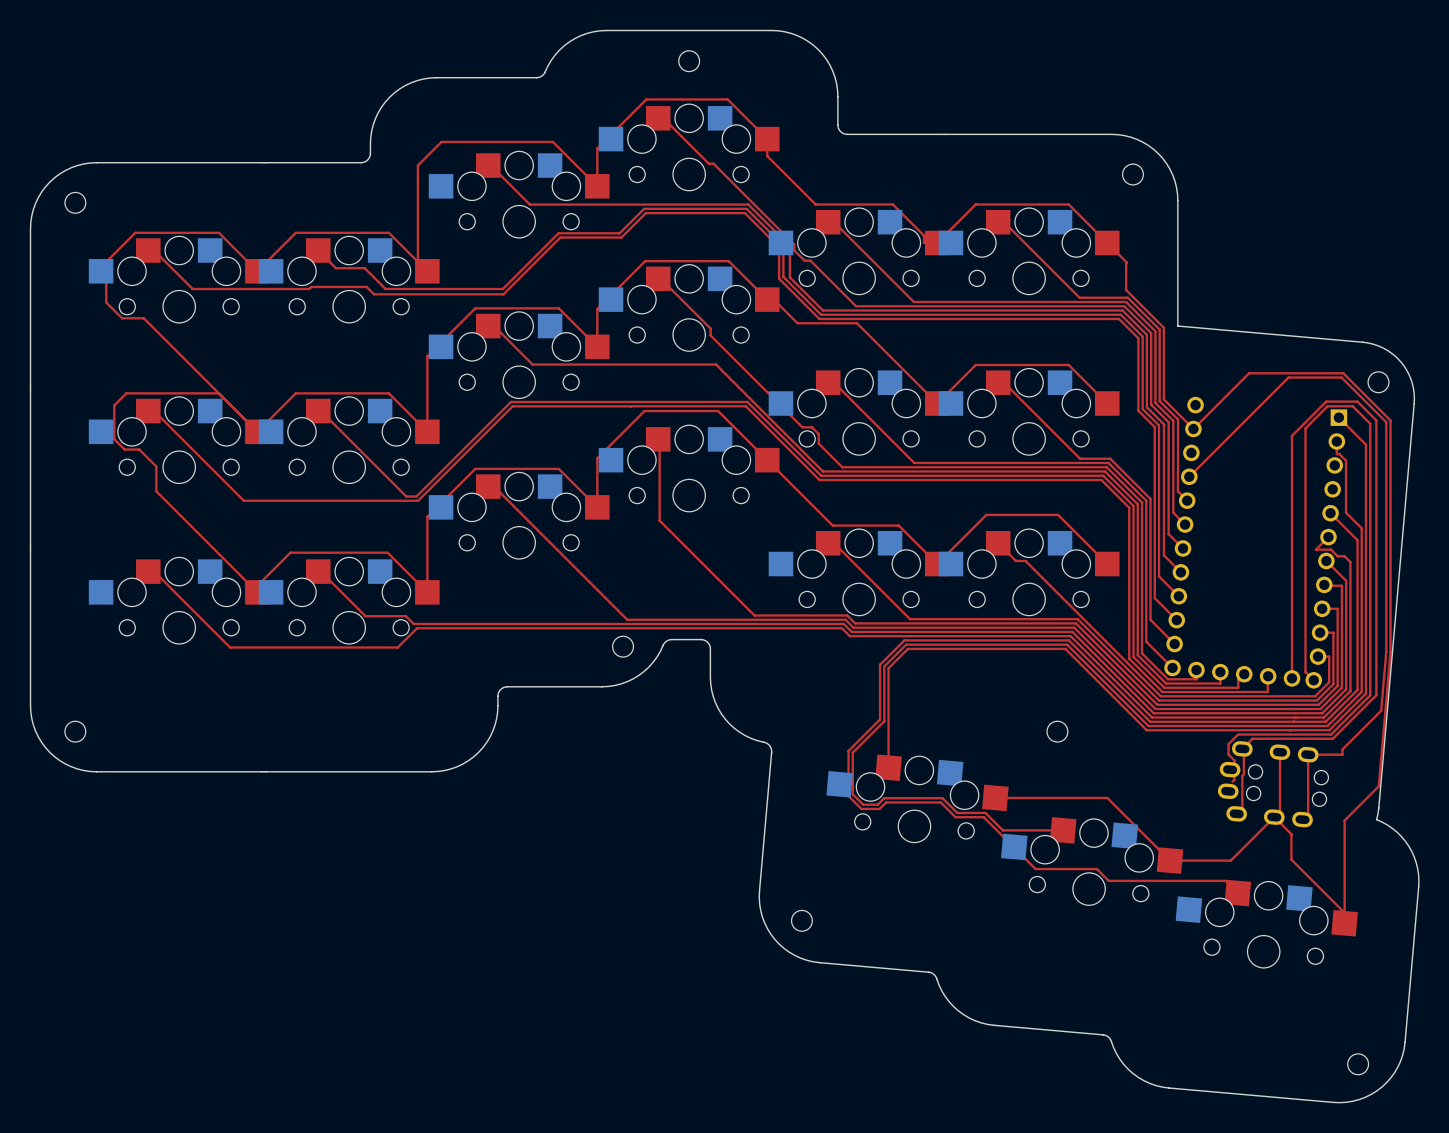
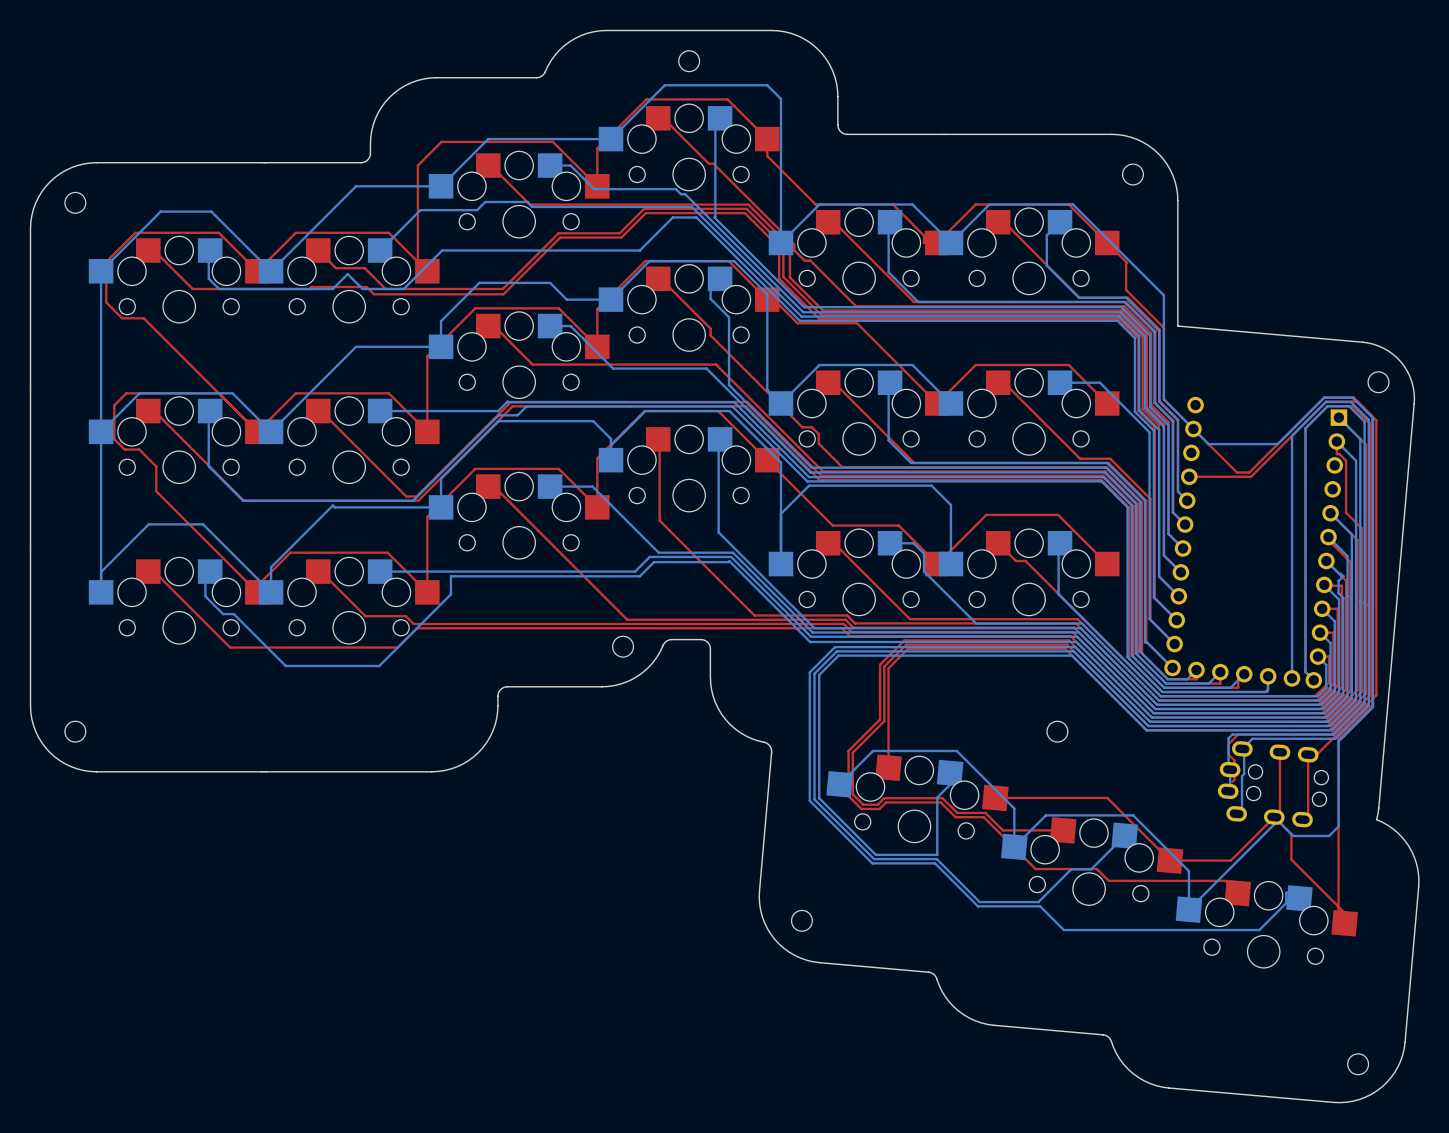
bottom track: none -> (720, 118) (715, 123) (714, 217) (804, 307) (1121, 307) (1150, 335) (1150, 406) (1168, 425) (1168, 533) (1183, 548)
bottom track: none -> (550, 165) (570, 165) (594, 189) (675, 189) (680, 194) (685, 194) (803, 312) (1121, 312) (1145, 336) (1145, 407) (1163, 426) (1163, 555) (1180, 572)
bottom track: none -> (890, 222) (888, 272) (918, 301) (1124, 301) (1154, 332) (1154, 402) (1172, 421) (1172, 512) (1185, 524)
bottom track: none -> (1060, 222) (1046, 235) (1046, 265) (1078, 297) (1126, 297) (1159, 330) (1159, 401) (1178, 420)
bottom track: none -> (210, 250) (208, 278) (219, 289) (332, 289) (347, 274) (362, 289) (403, 289) (442, 250) (639, 250) (672, 217) (696, 217) (799, 320) (1117, 320) (1135, 338) (1135, 411) (1153, 430) (1153, 597) (1176, 620)
bottom track: none -> (380, 250) (420, 210) (477, 210) (485, 201) (527, 201) (532, 206) (691, 206) (801, 316) (1119, 316) (1139, 336) (1139, 410) (1159, 429) (1159, 576) (1178, 596)
bottom track: none -> (720, 278) (710, 288) (710, 298) (729, 317) (729, 385) (811, 467) (1105, 467) (1140, 502) (1140, 651) (1167, 679) (1187, 679) (1196, 670)
bottom track: none -> (550, 326) (570, 326) (613, 368) (706, 368) (810, 472) (1104, 472) (1136, 503) (1136, 653) (1165, 683) (1208, 683) (1220, 672)
bottom track: none -> (890, 382) (888, 440) (911, 462) (1107, 462) (1145, 500) (1145, 642) (1172, 667)
bottom track: none -> (1060, 382) (1099, 382) (1149, 432) (1149, 618) (1174, 644)
bottom track: none -> (950, 403) (912, 365) (819, 365) (780, 403) (767, 389) (767, 294) (734, 261) (649, 261) (611, 299) (566, 299) (550, 282) (479, 282) (441, 321) (441, 346) (356, 346) (271, 431) (232, 393) (139, 393) (101, 431)
bottom track: none -> (210, 411) (208, 466) (243, 500) (413, 500) (498, 415) (517, 415) (526, 406) (732, 406) (807, 481) (1101, 481) (1127, 507) (1127, 657) (1162, 692) (1265, 692) (1268, 689) (1268, 676)
bottom track: none -> (380, 411) (498, 411) (507, 401) (734, 402) (809, 477) (1103, 477) (1131, 505) (1131, 655) (1164, 687) (1230, 687) (1244, 674)
bottom track: none -> (1338, 417) (1360, 439) (1360, 701) (1331, 730) (1146, 730) (1071, 655) (838, 655) (819, 674) (819, 798) (875, 854) (937, 854) (937, 797) (950, 784) (950, 773)
bottom track: none -> (1177, 420) (1177, 491) (1187, 500)
top track: (1193, 428) (1249, 373) (1343, 373) (1390, 420) (1390, 652) (1378, 786) (1344, 820) (1344, 912) -> (1193, 428) (1237, 472) (1249, 472) (1324, 397) (1353, 397) (1372, 416) (1372, 705) (1338, 738) (1338, 917) (1344, 923)
top track: (1292, 435) (1292, 678) -> (1292, 435) (1251, 476) (1189, 476)
bottom track: none -> (720, 439) (718, 532) (814, 628) (1080, 628) (1157, 704) (1321, 704) (1334, 691) (1334, 621) (1322, 608)
bottom track: none -> (1336, 441) (1356, 460) (1356, 700) (1330, 726) (1148, 726) (1073, 651) (836, 651) (814, 673) (814, 799) (874, 859) (936, 859) (979, 902) (1038, 902) (1071, 869) (1091, 869) (1124, 835)
bottom track: none -> (611, 445) (645, 411) (729, 411) (780, 462) (780, 564)
bottom track: none -> (611, 460) (611, 438) (593, 421) (498, 421) (441, 478) (441, 507) (334, 507) (332, 505) (271, 567) (271, 592) (203, 524) (148, 524) (101, 572)
top track: (1189, 476) (1288, 377) (1341, 377) (1386, 422) (1386, 651) (1381, 710) (1342, 749) (1342, 754) (1316, 754) -> none
bottom track: none -> (550, 486) (592, 486) (658, 552) (732, 552) (812, 632) (1078, 632) (1155, 709) (1323, 709) (1339, 693) (1339, 599) (1324, 584)
bottom track: none -> (780, 513) (809, 485) (931, 485) (950, 505) (950, 564)
bottom track: none -> (1330, 513) (1351, 534) (1351, 698) (1328, 721) (1150, 721) (1075, 647) (835, 647) (809, 672) (809, 800) (872, 863) (935, 863) (978, 906) (1040, 906) (1063, 930) (1259, 930) (1286, 903) (1286, 892) (1293, 892) (1299, 898)
top track: (1328, 537) (1315, 549) (1331, 549) (1337, 556) (1344, 556) -> (1328, 537) (1328, 540) (1344, 556)
bottom track: none -> (1328, 537) (1347, 556) (1347, 696) (1326, 717) (1151, 717) (1076, 641) (810, 641) (729, 561) (653, 562) (639, 576) (450, 576) (450, 594) (379, 666) (285, 666) (233, 614) (223, 614) (205, 596) (205, 576) (210, 571)
bottom track: none -> (890, 543) (913, 543) (924, 553) (924, 571) (976, 623) (1081, 623) (1158, 700) (1319, 700) (1330, 689) (1330, 643) (1320, 632)
bottom track: none -> (1060, 543) (1058, 594) (1160, 696) (1317, 696) (1326, 687) (1326, 664) (1318, 656)
bottom track: none -> (1326, 561) (1343, 576)
bottom track: none -> (380, 571) (635, 571) (649, 556) (731, 556) (810, 636) (1077, 636) (1153, 713) (1324, 713) (1343, 694) (1343, 597) (1338, 593) (1338, 581) (1343, 576)
bottom track: none -> (1340, 573) (1343, 576)
bottom track: none -> (101, 592) (101, 271) (160, 211) (211, 211) (271, 271) (356, 186) (441, 186) (488, 139) (611, 139) (664, 85) (767, 85) (780, 98) (780, 242) (819, 204) (912, 204) (950, 242) (989, 204) (1073, 204) (1163, 295) (1163, 399) (1208, 444) (1277, 444) (1324, 397) (1352, 397) (1373, 418) (1373, 707) (1338, 741) (1338, 826) (1329, 836) (1293, 836) (1274, 817) (1274, 824) (1188, 909) (1188, 871) (1133, 815) (1045, 815) (1014, 846) (1014, 808) (956, 751) (873, 751) (839, 784)
bottom track: none -> (1292, 678) (1292, 435) (1325, 402) (1350, 402) (1368, 419) (1368, 705) (1335, 738) (1252, 738) (1242, 748) (1244, 750) (1244, 773) (1242, 776) (1242, 808) (1236, 813)
bottom track: none -> (1313, 680) (1305, 672) (1305, 428) (1327, 406) (1349, 406) (1364, 421) (1364, 703) (1333, 734) (1232, 734) (1228, 738) (1230, 789) (1228, 791)
top track: (1332, 738) (1252, 738) (1242, 748) (1243, 750) (1242, 808) (1236, 813) -> (1332, 738) (1316, 754)

